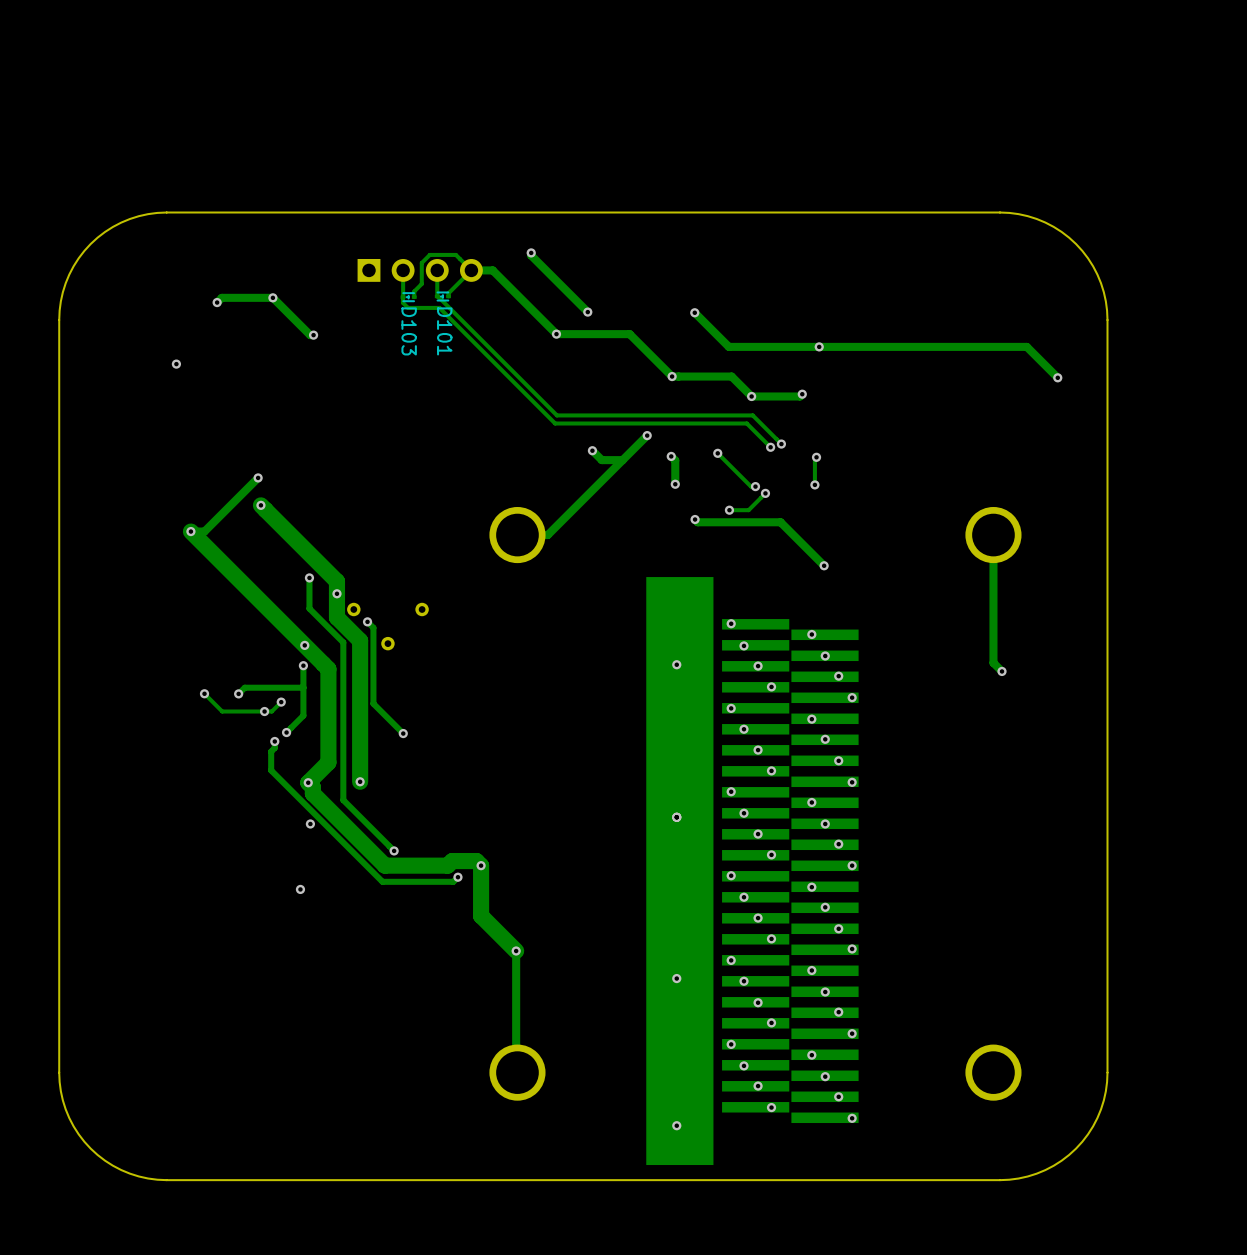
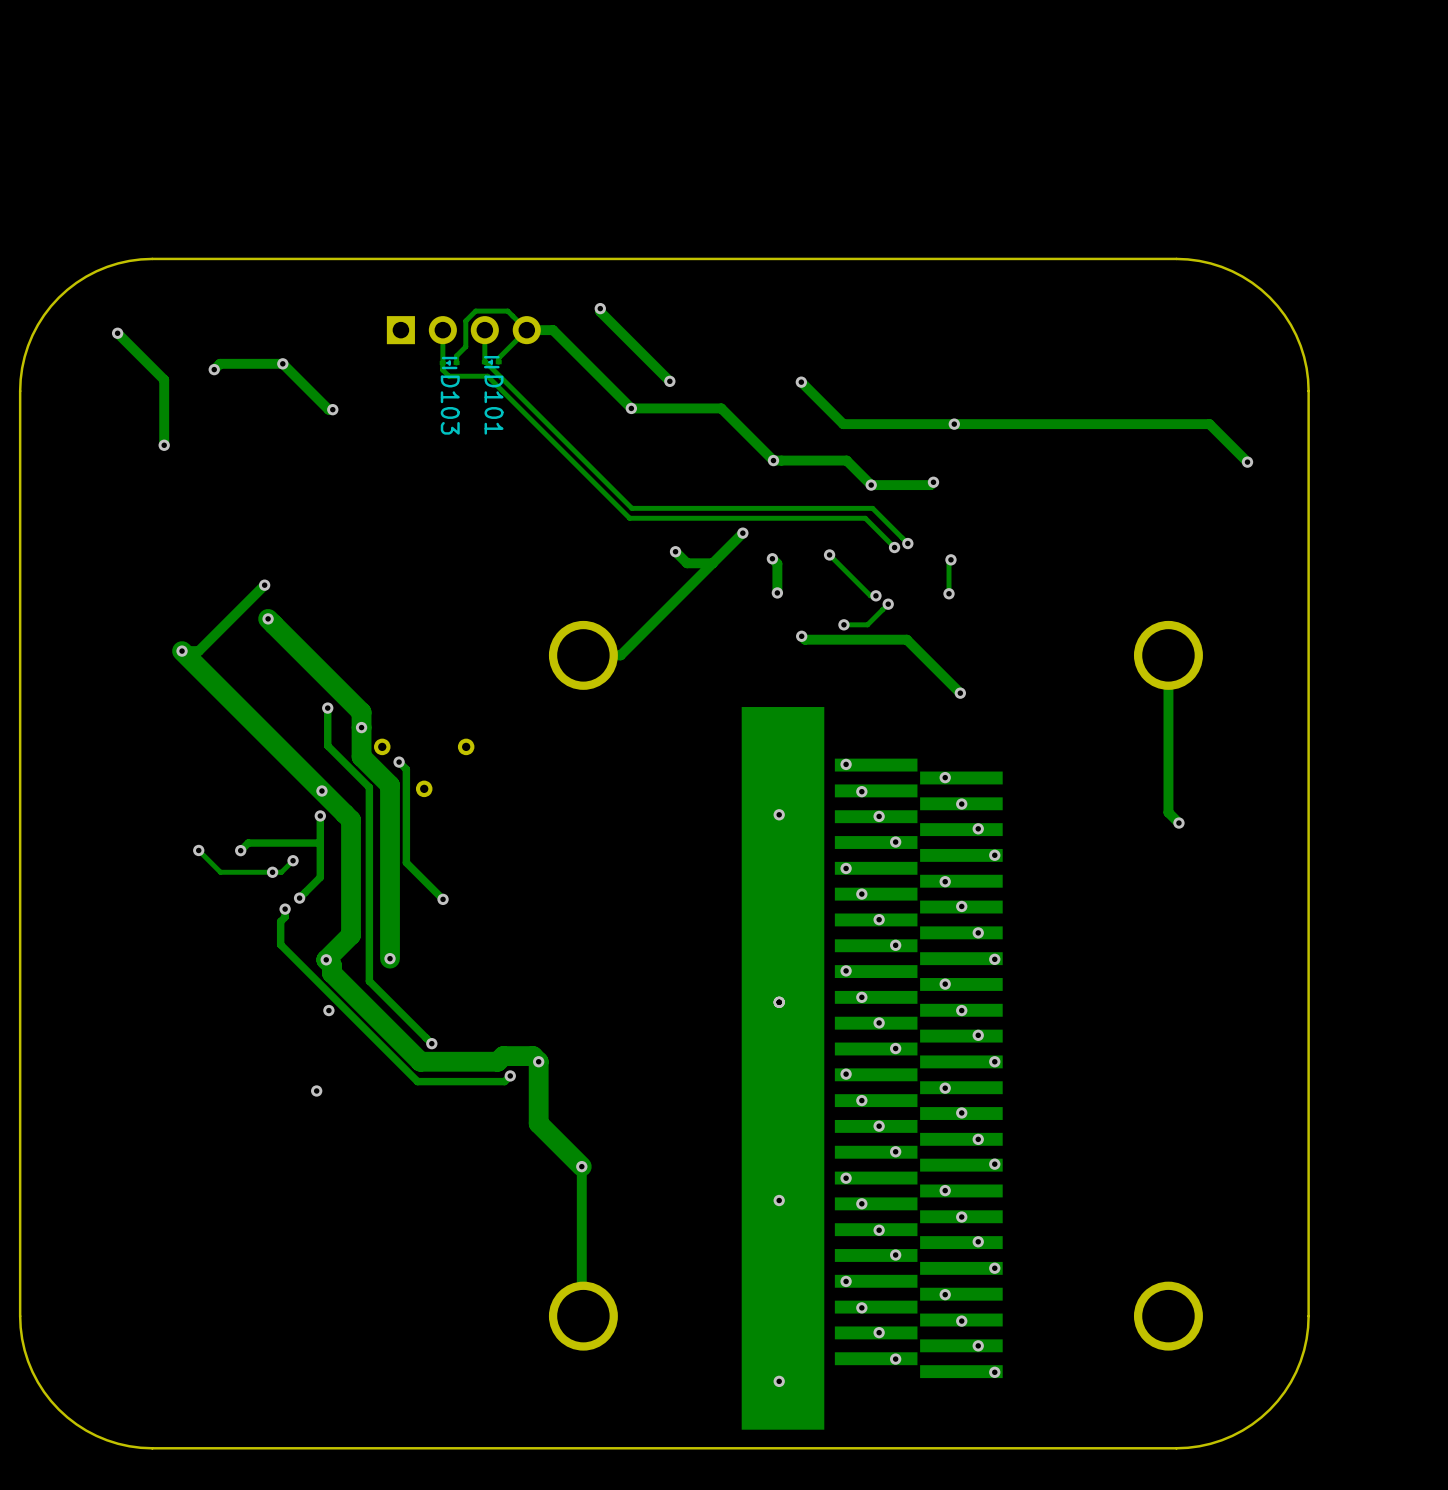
track: none -> (117, 333) (164, 379) (164, 445)
via: none -> (117, 333)

